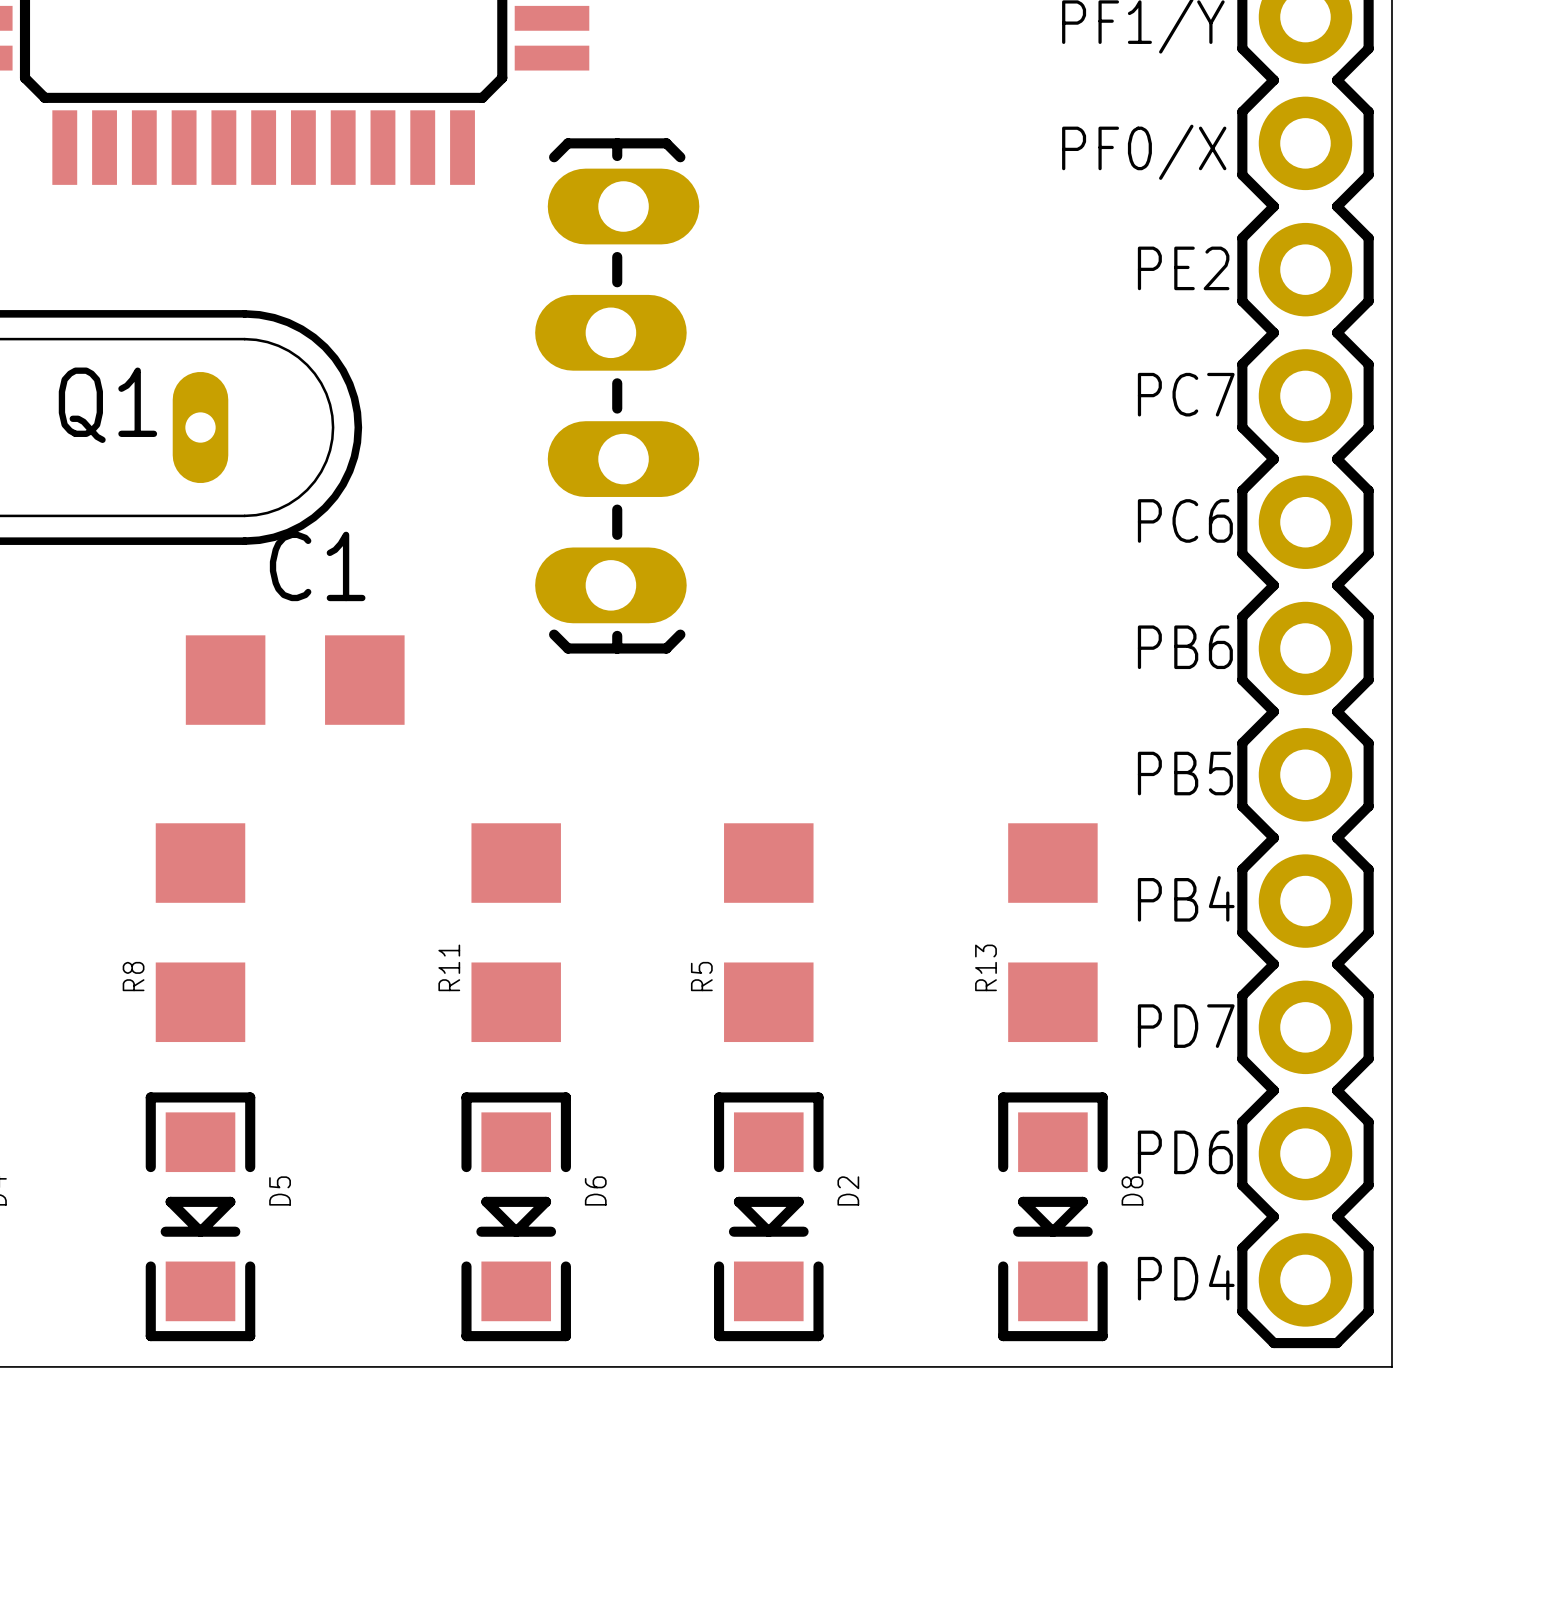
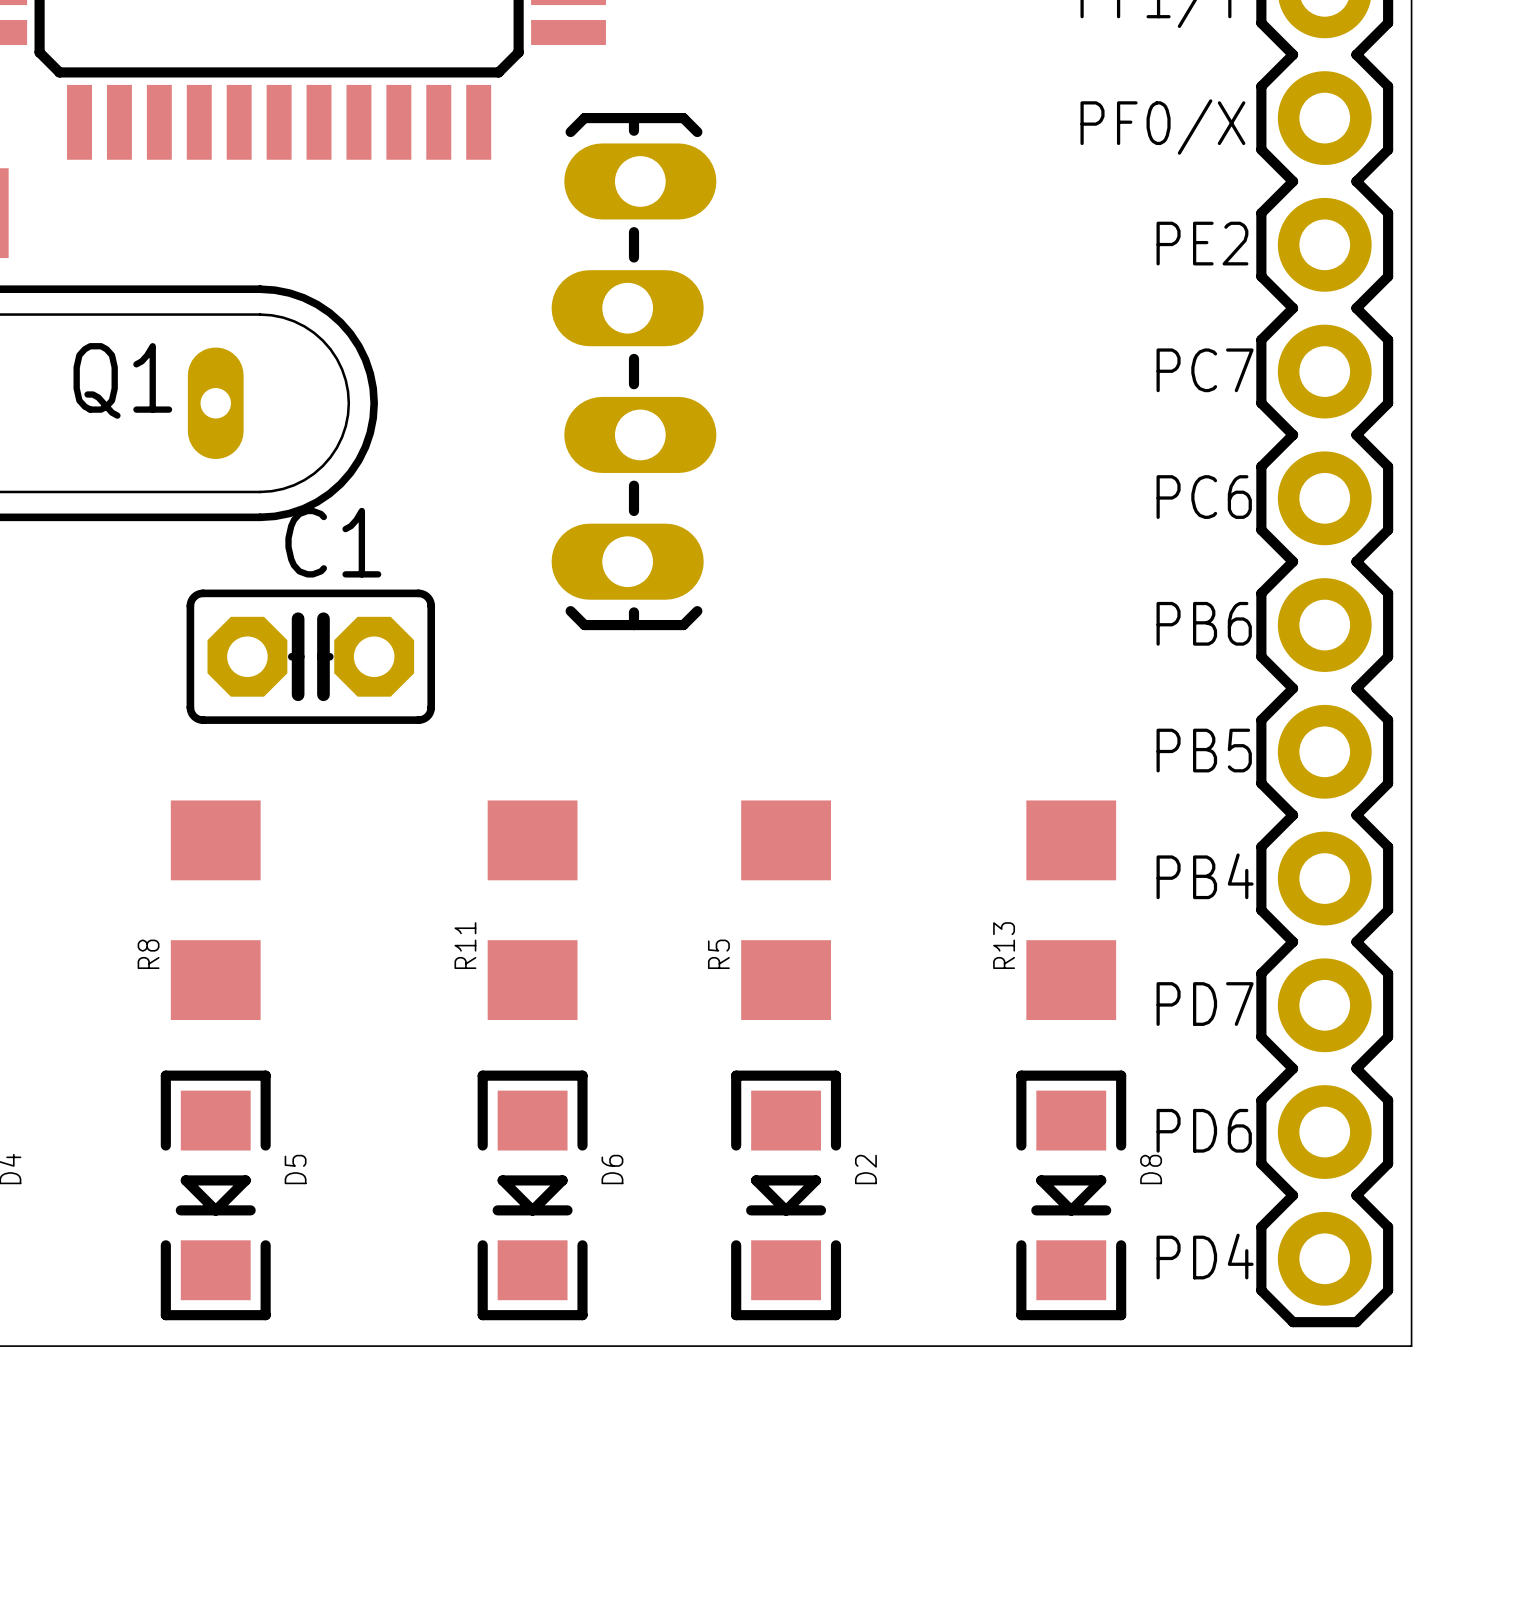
C1 footprint: [185, 635, 405, 725] -> [186, 589, 436, 724]

